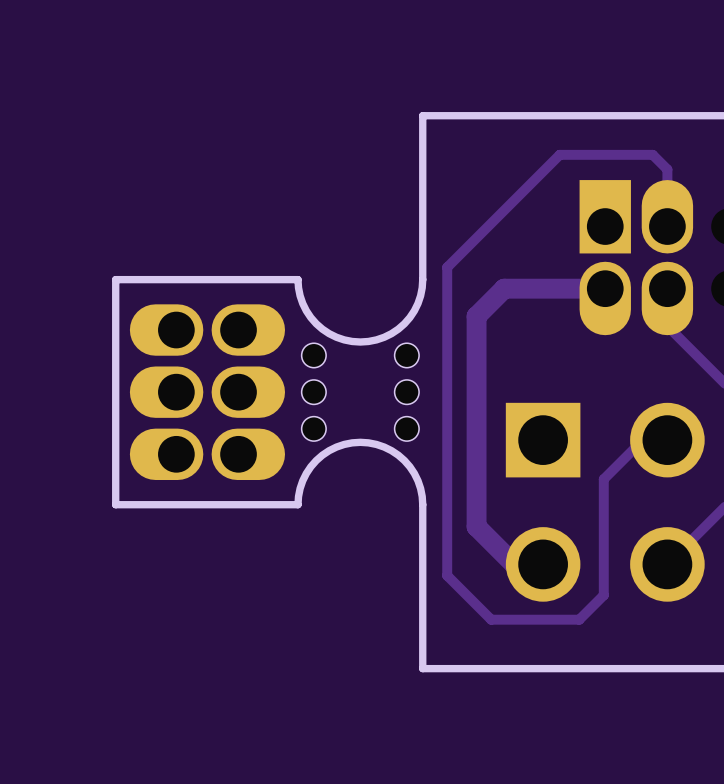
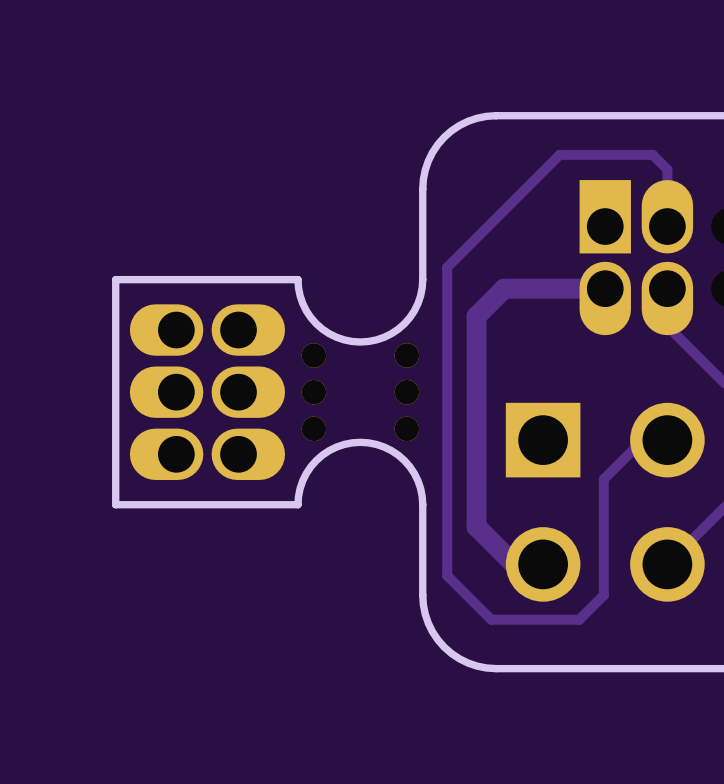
board edge: (496, 115) (422, 115) (422, 189) -> (496, 115) (468, 121) (444, 137) (428, 161) (422, 189)
part footprint: [301, 343, 420, 442] -> [301, 343, 420, 442]
board edge: (422, 595) (422, 668) (496, 668) -> (422, 595) (428, 623) (444, 647) (468, 663) (496, 668)

